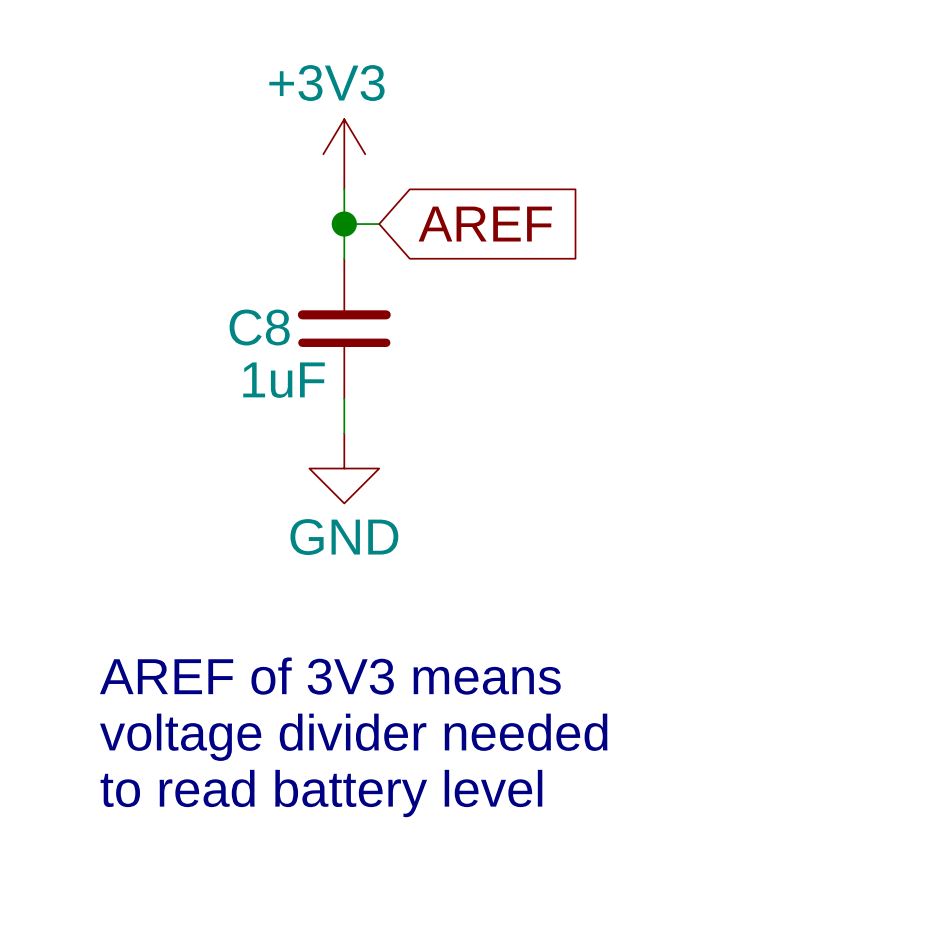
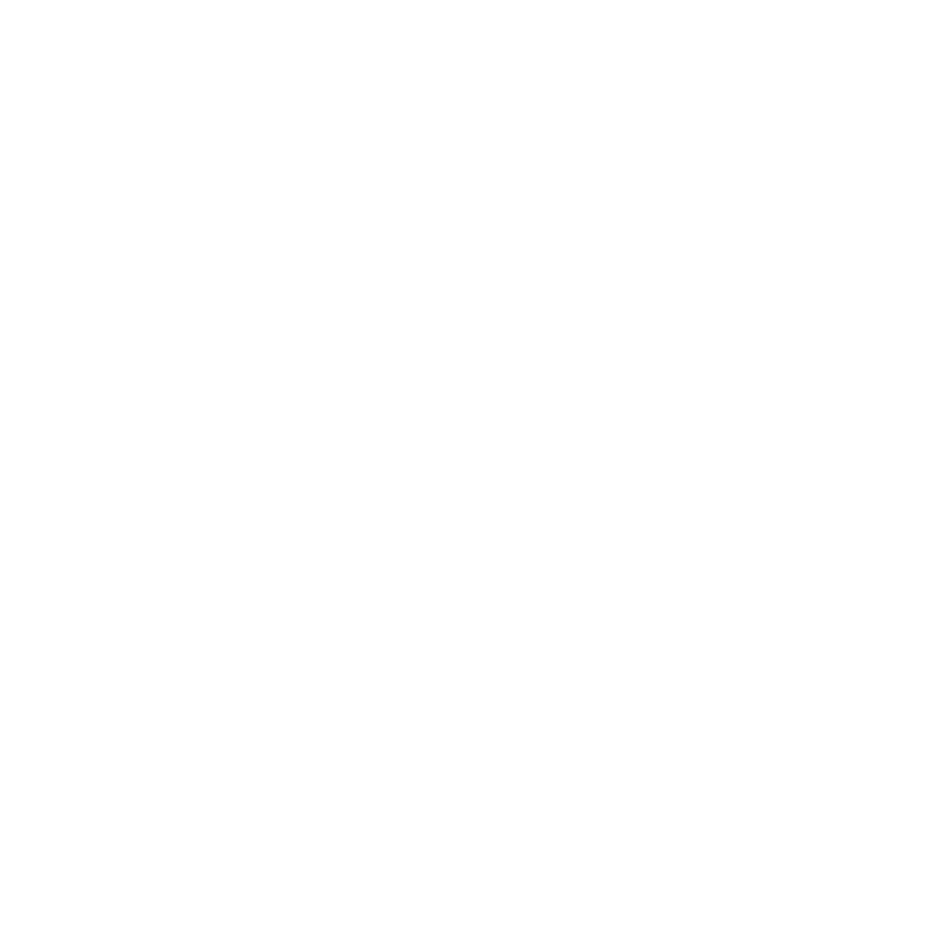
power symbol: +3V3 (344, 154) -> none
wire: (344, 189) (344, 258) -> none
wire: (344, 224) (379, 224) -> none
junction: (344, 224) -> none
global label: AREF (485, 224) -> none
C8: 1uF (344, 328) -> none
wire: (344, 398) (344, 433) -> none
power symbol: GND (344, 468) -> none
text: AREF of 3V3 means (330, 676) -> none
text: voltage divider needed (353, 737) -> none
text: to read battery level (321, 793) -> none

